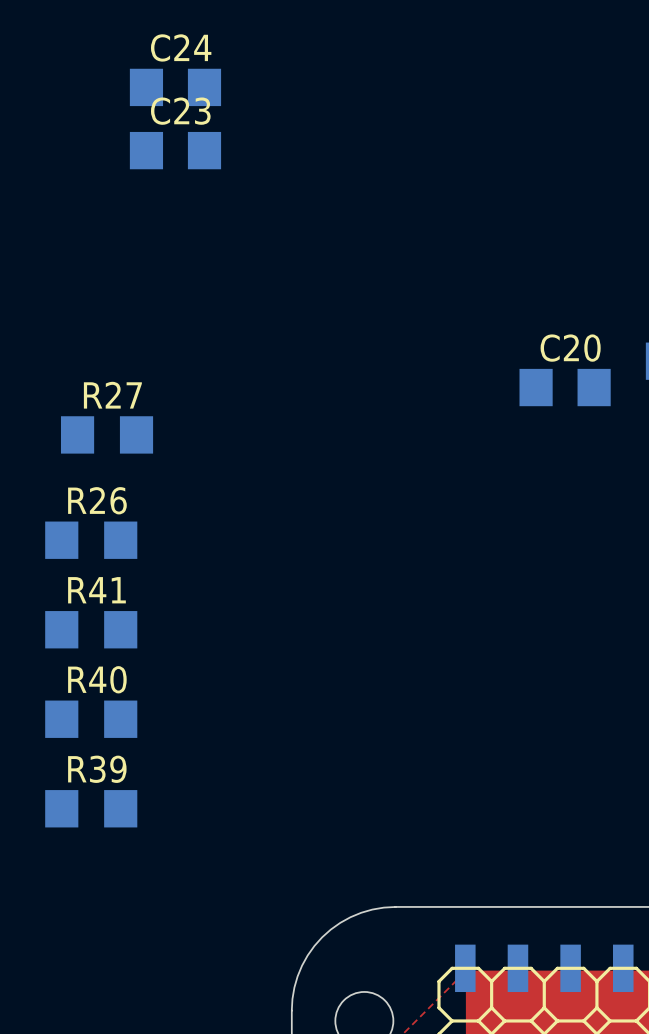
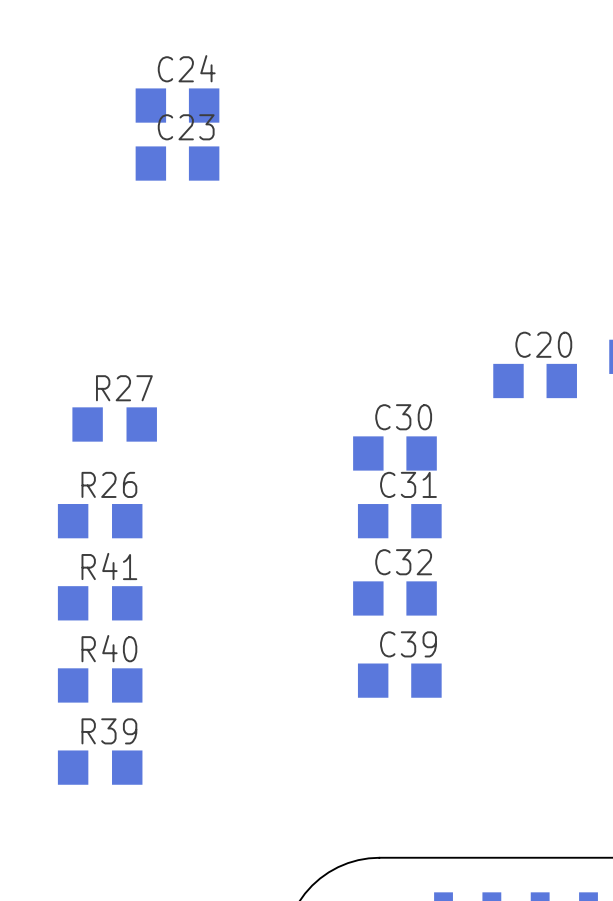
C30: none -> (394, 453)
C31: none -> (399, 521)
C32: none -> (394, 598)
C39: none -> (399, 680)

